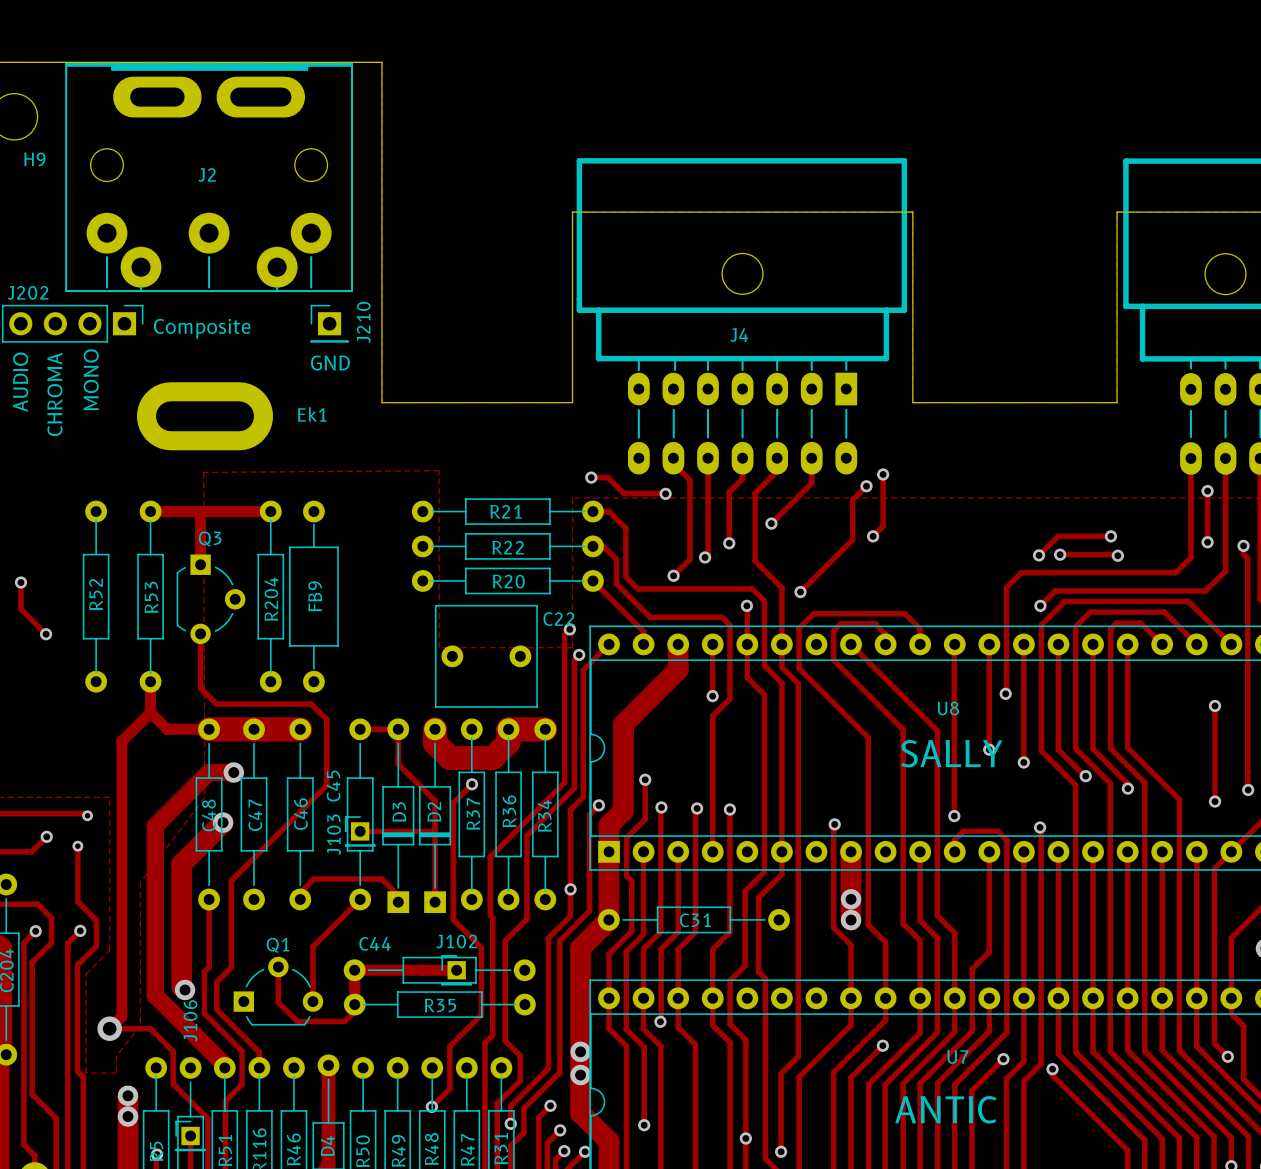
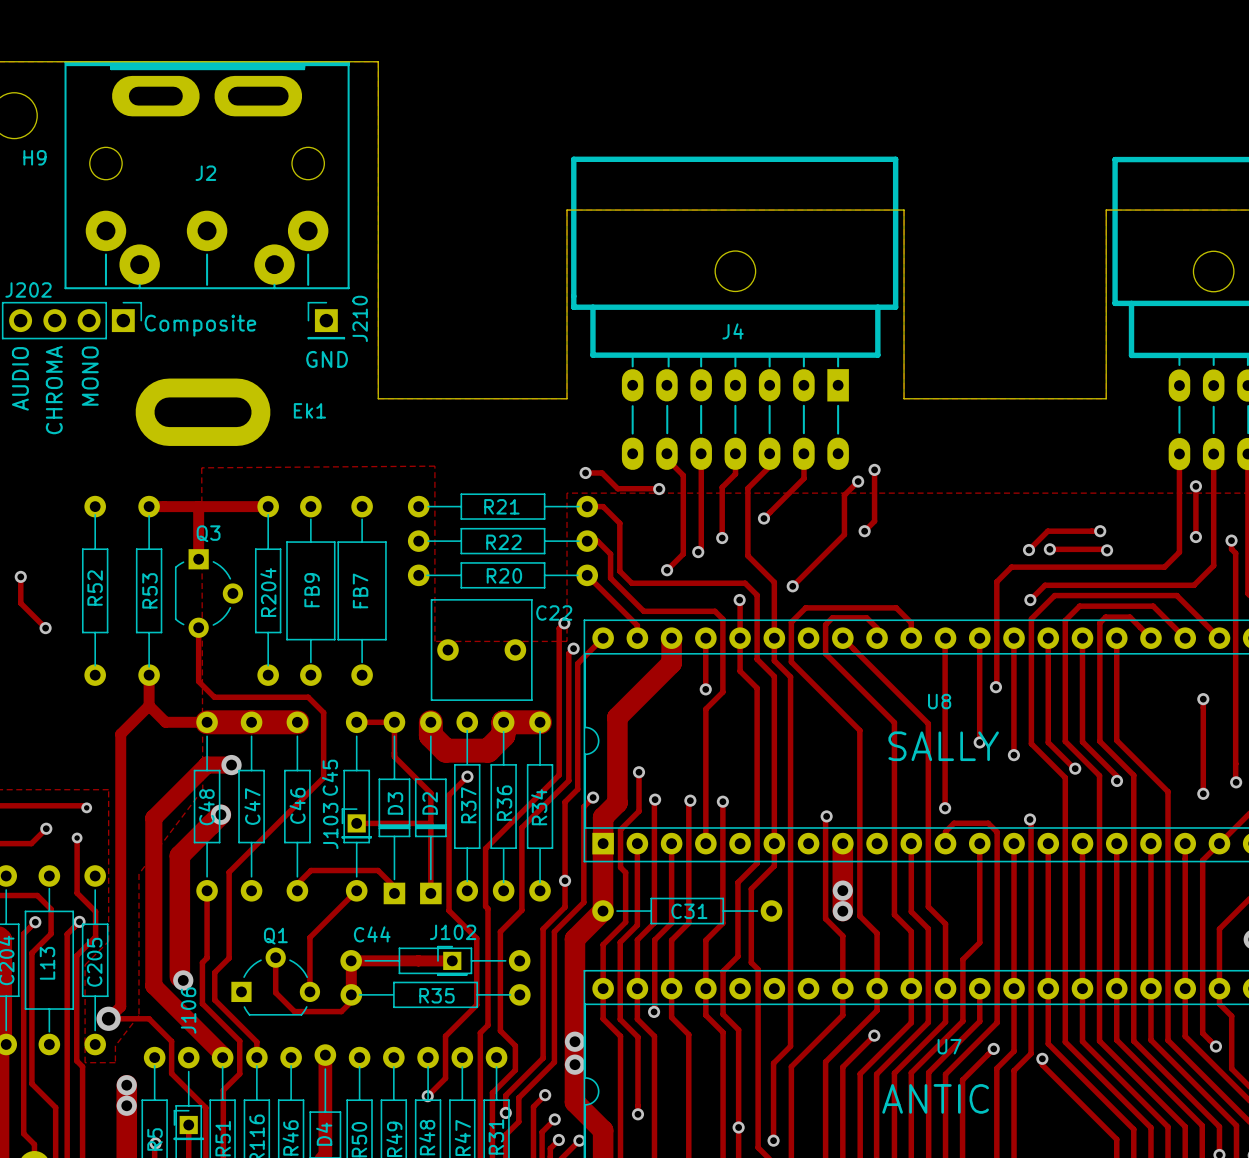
FB7: none -> (362, 590)
L13: none -> (49, 960)
C205: none -> (95, 960)

